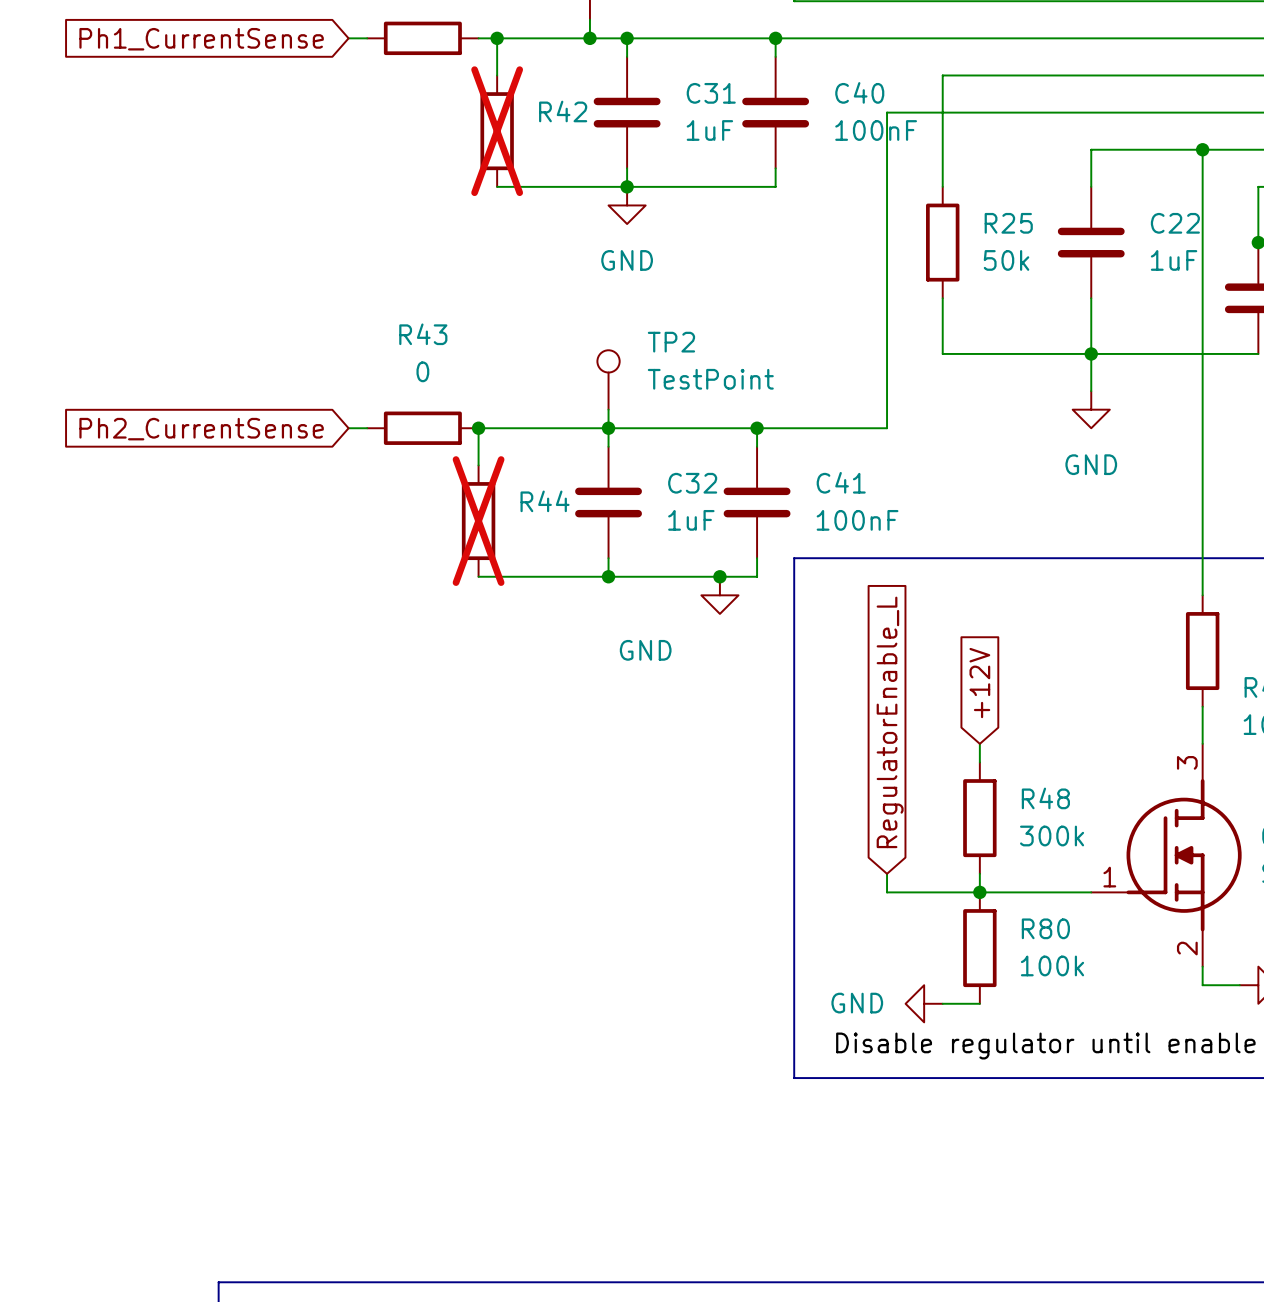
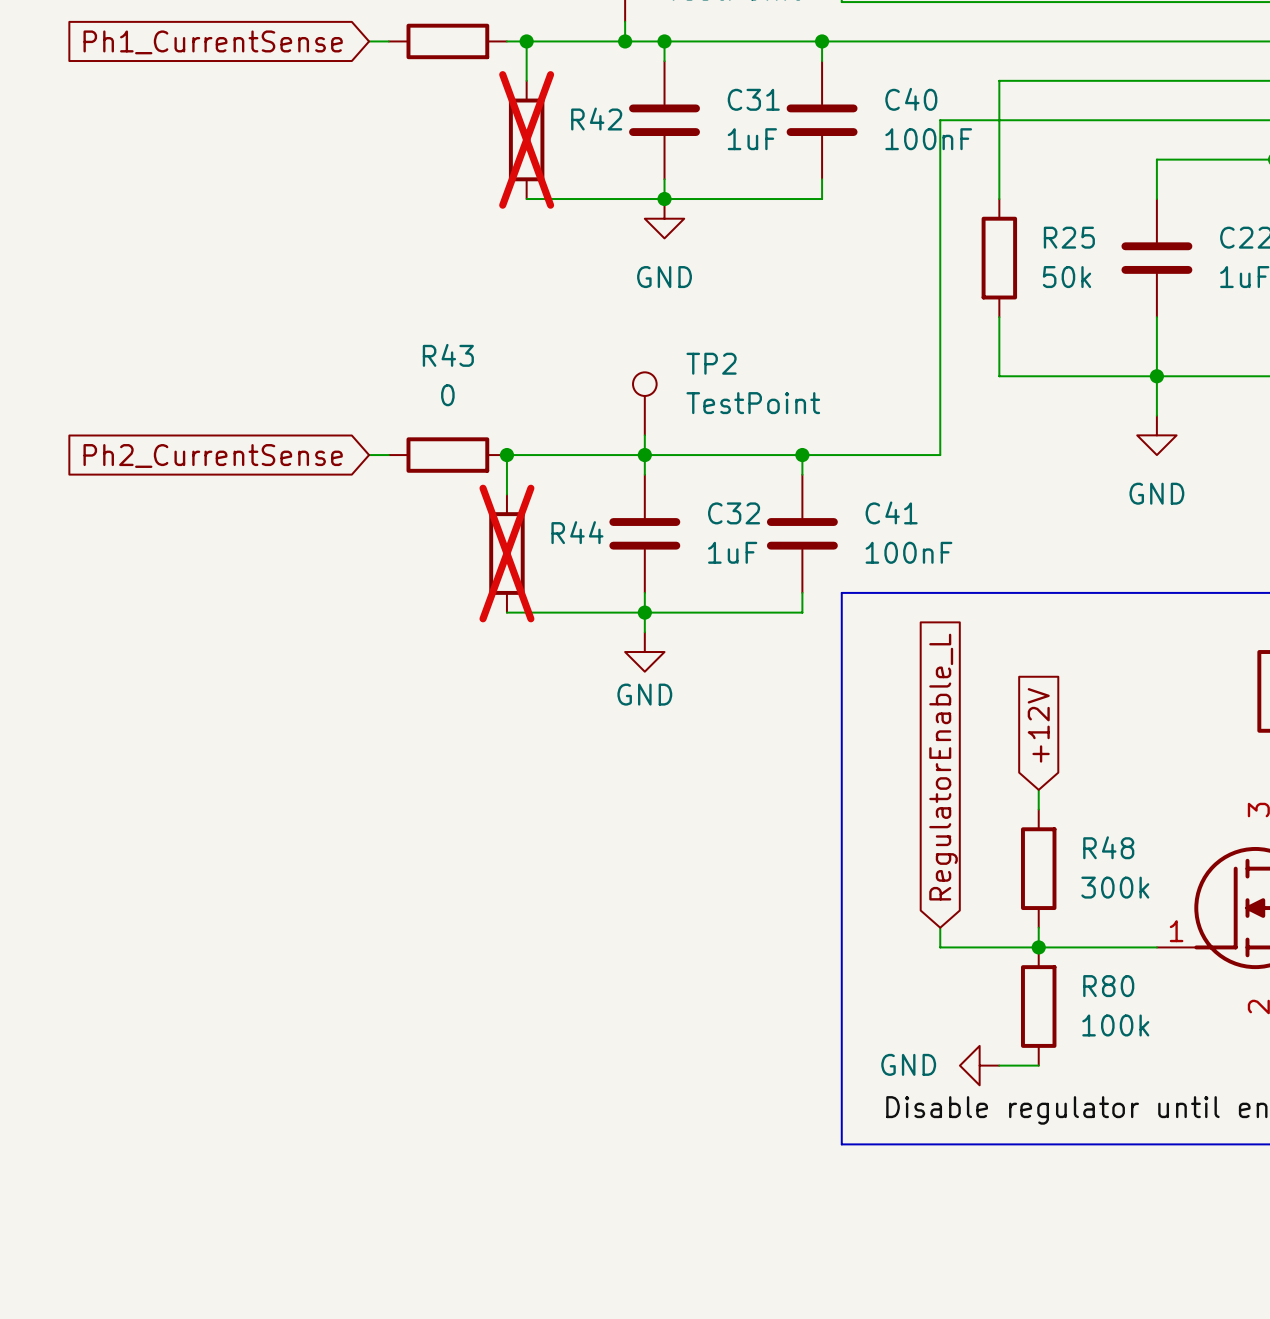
wire: none -> (644, 612) (644, 632)
junction: (719, 576) -> none
power symbol position: GND (719, 595) -> GND (644, 652)
power symbol text position: GND (645, 650) -> GND (644, 694)

